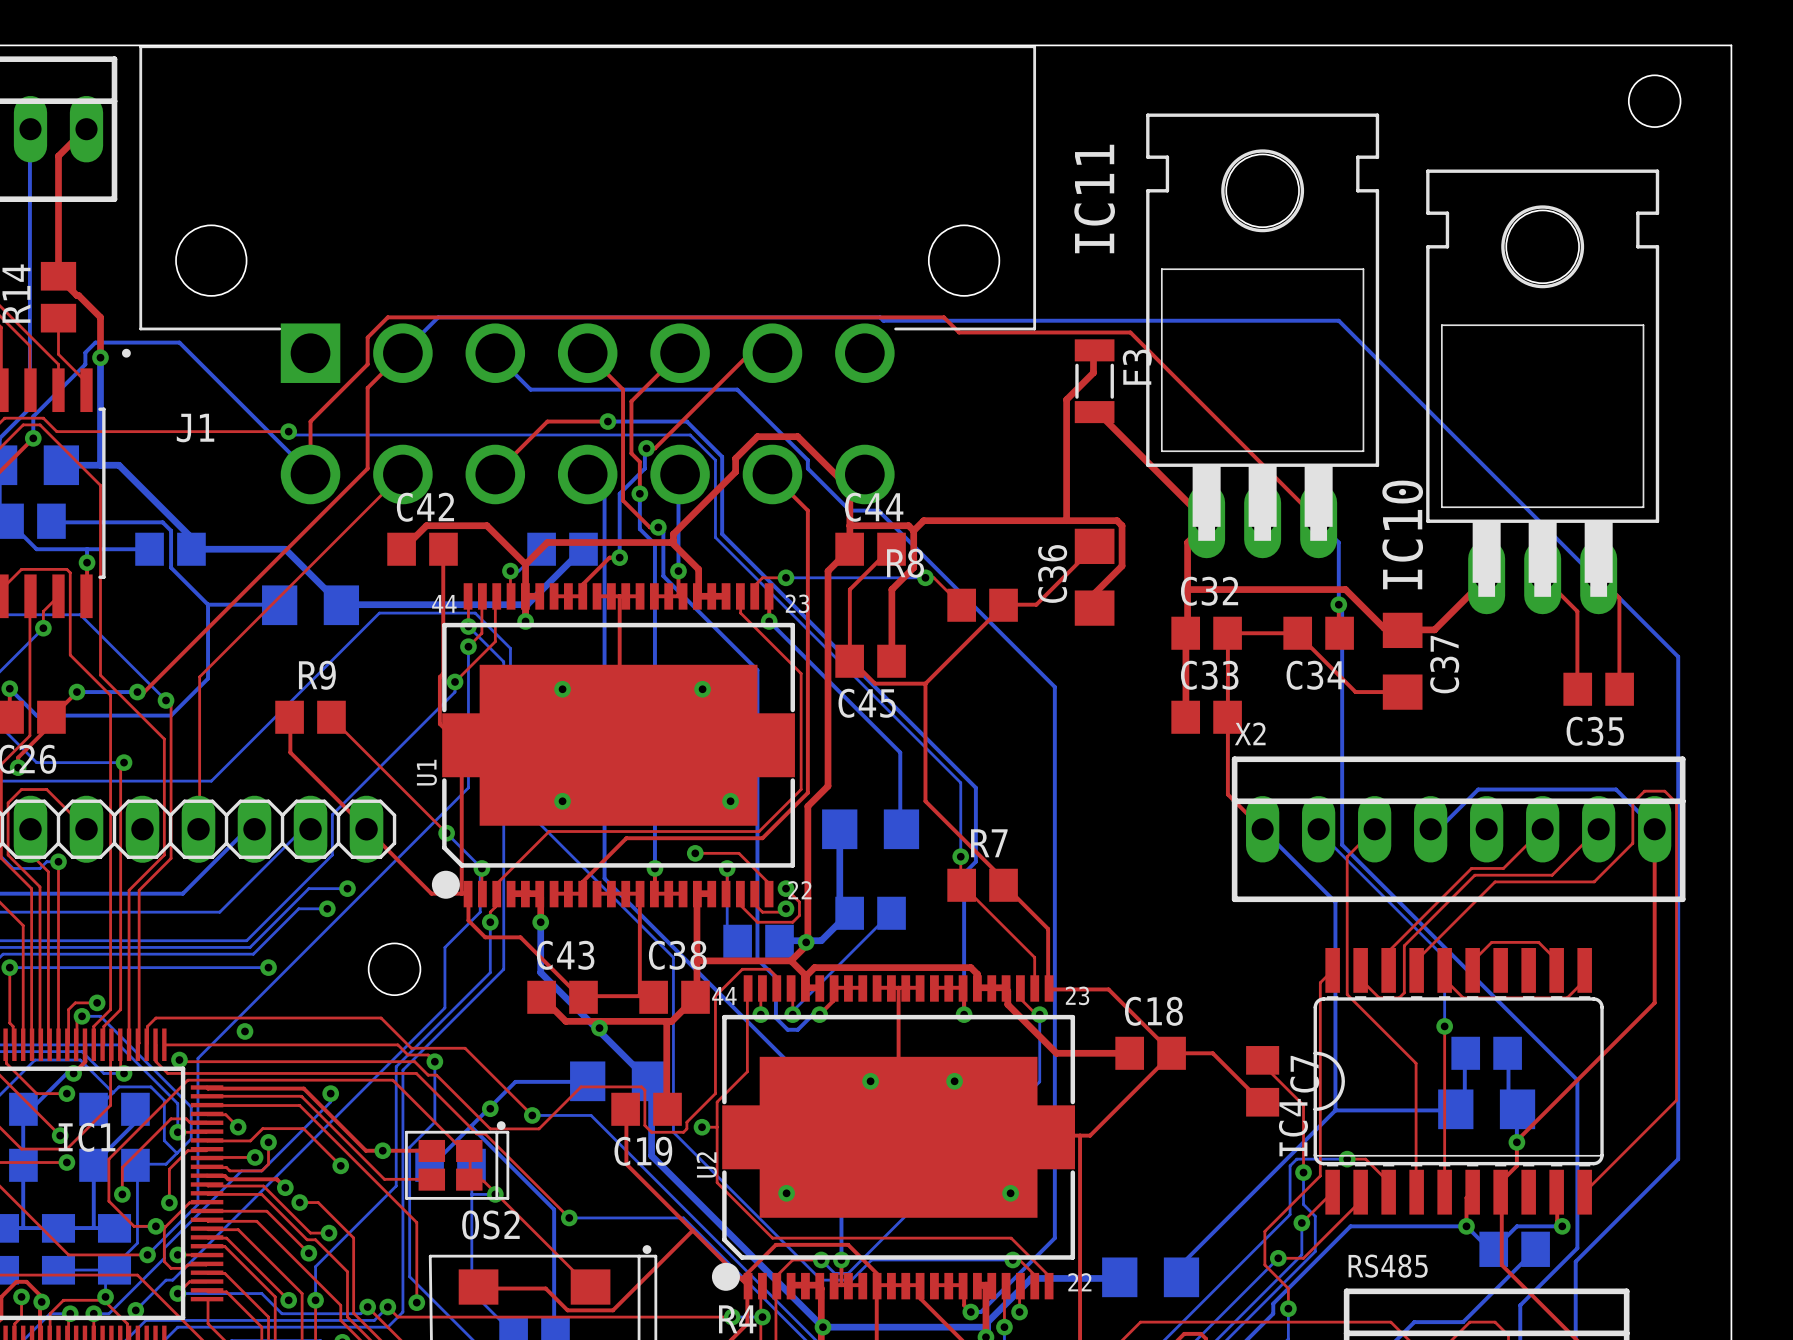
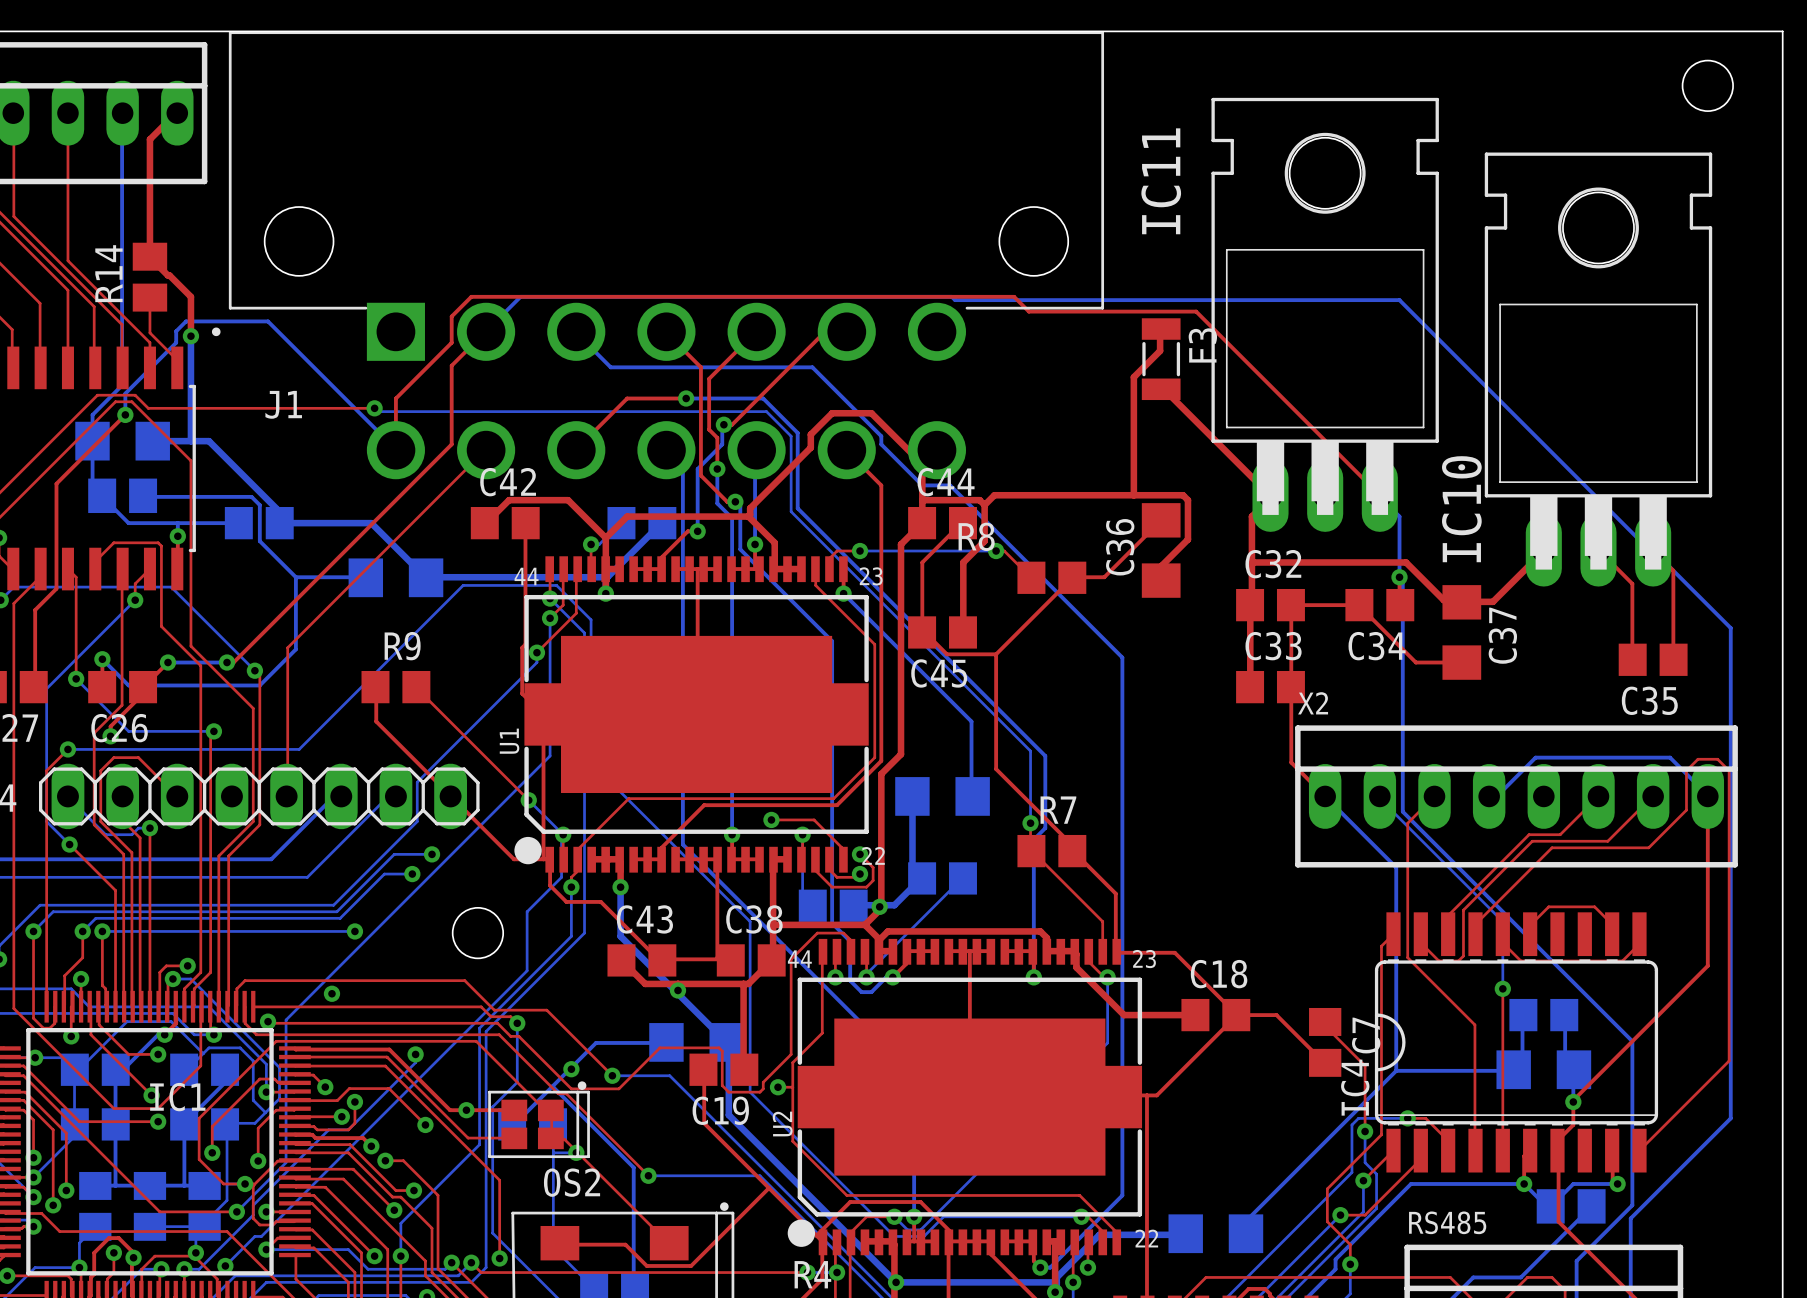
via: (562, 689) -> none
via: (702, 689) -> none
via: (562, 801) -> none
via: (730, 801) -> none
via: (870, 1081) -> none
via: (954, 1081) -> none
via: (786, 1193) -> none
via: (1010, 1193) -> none

